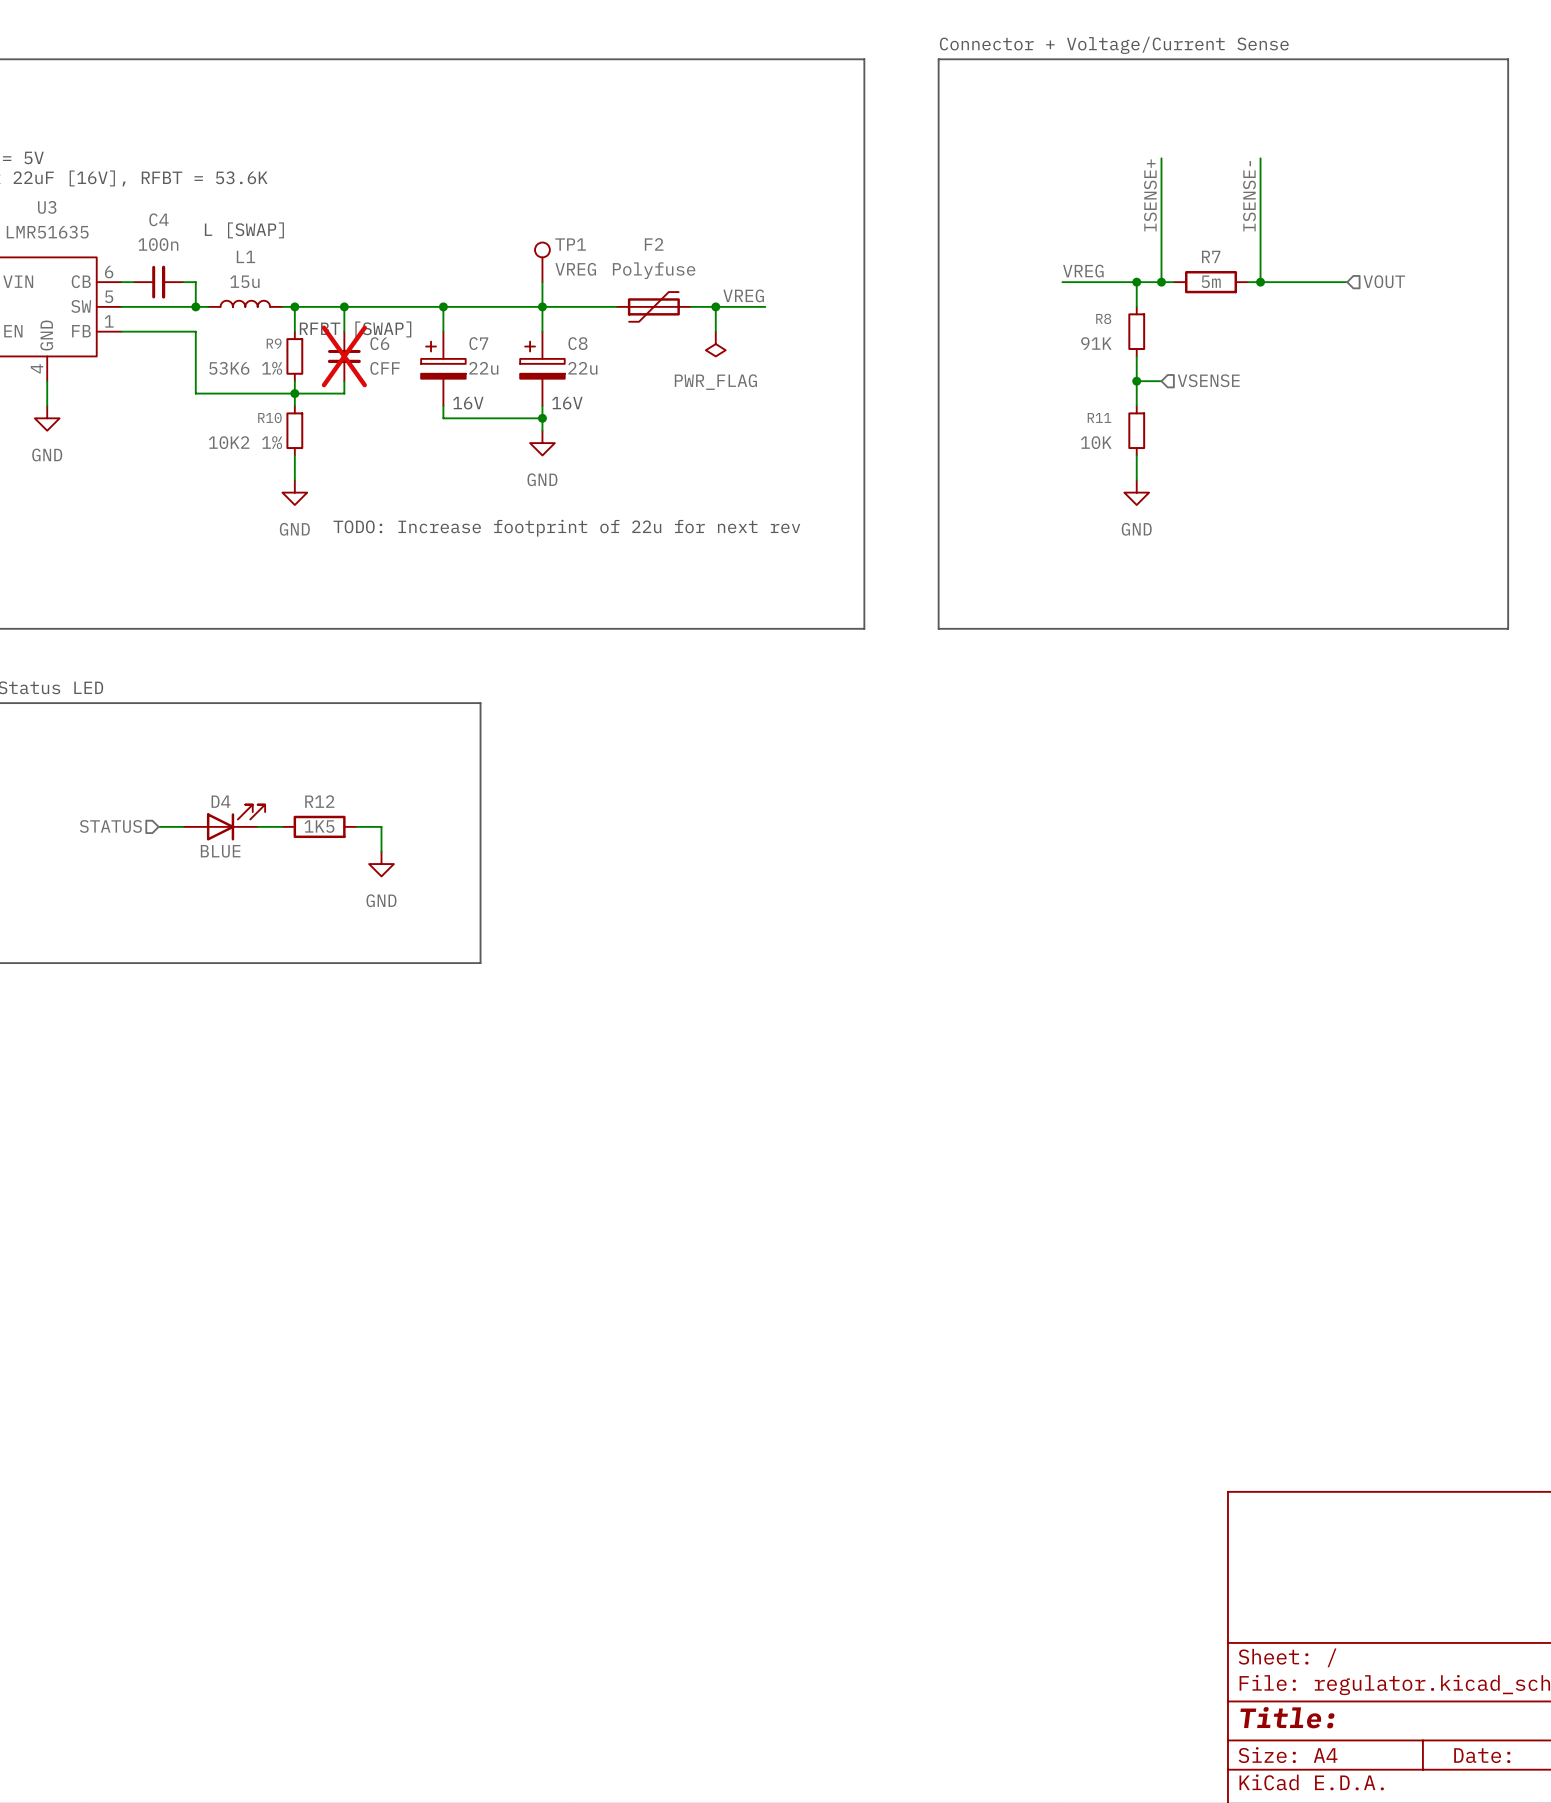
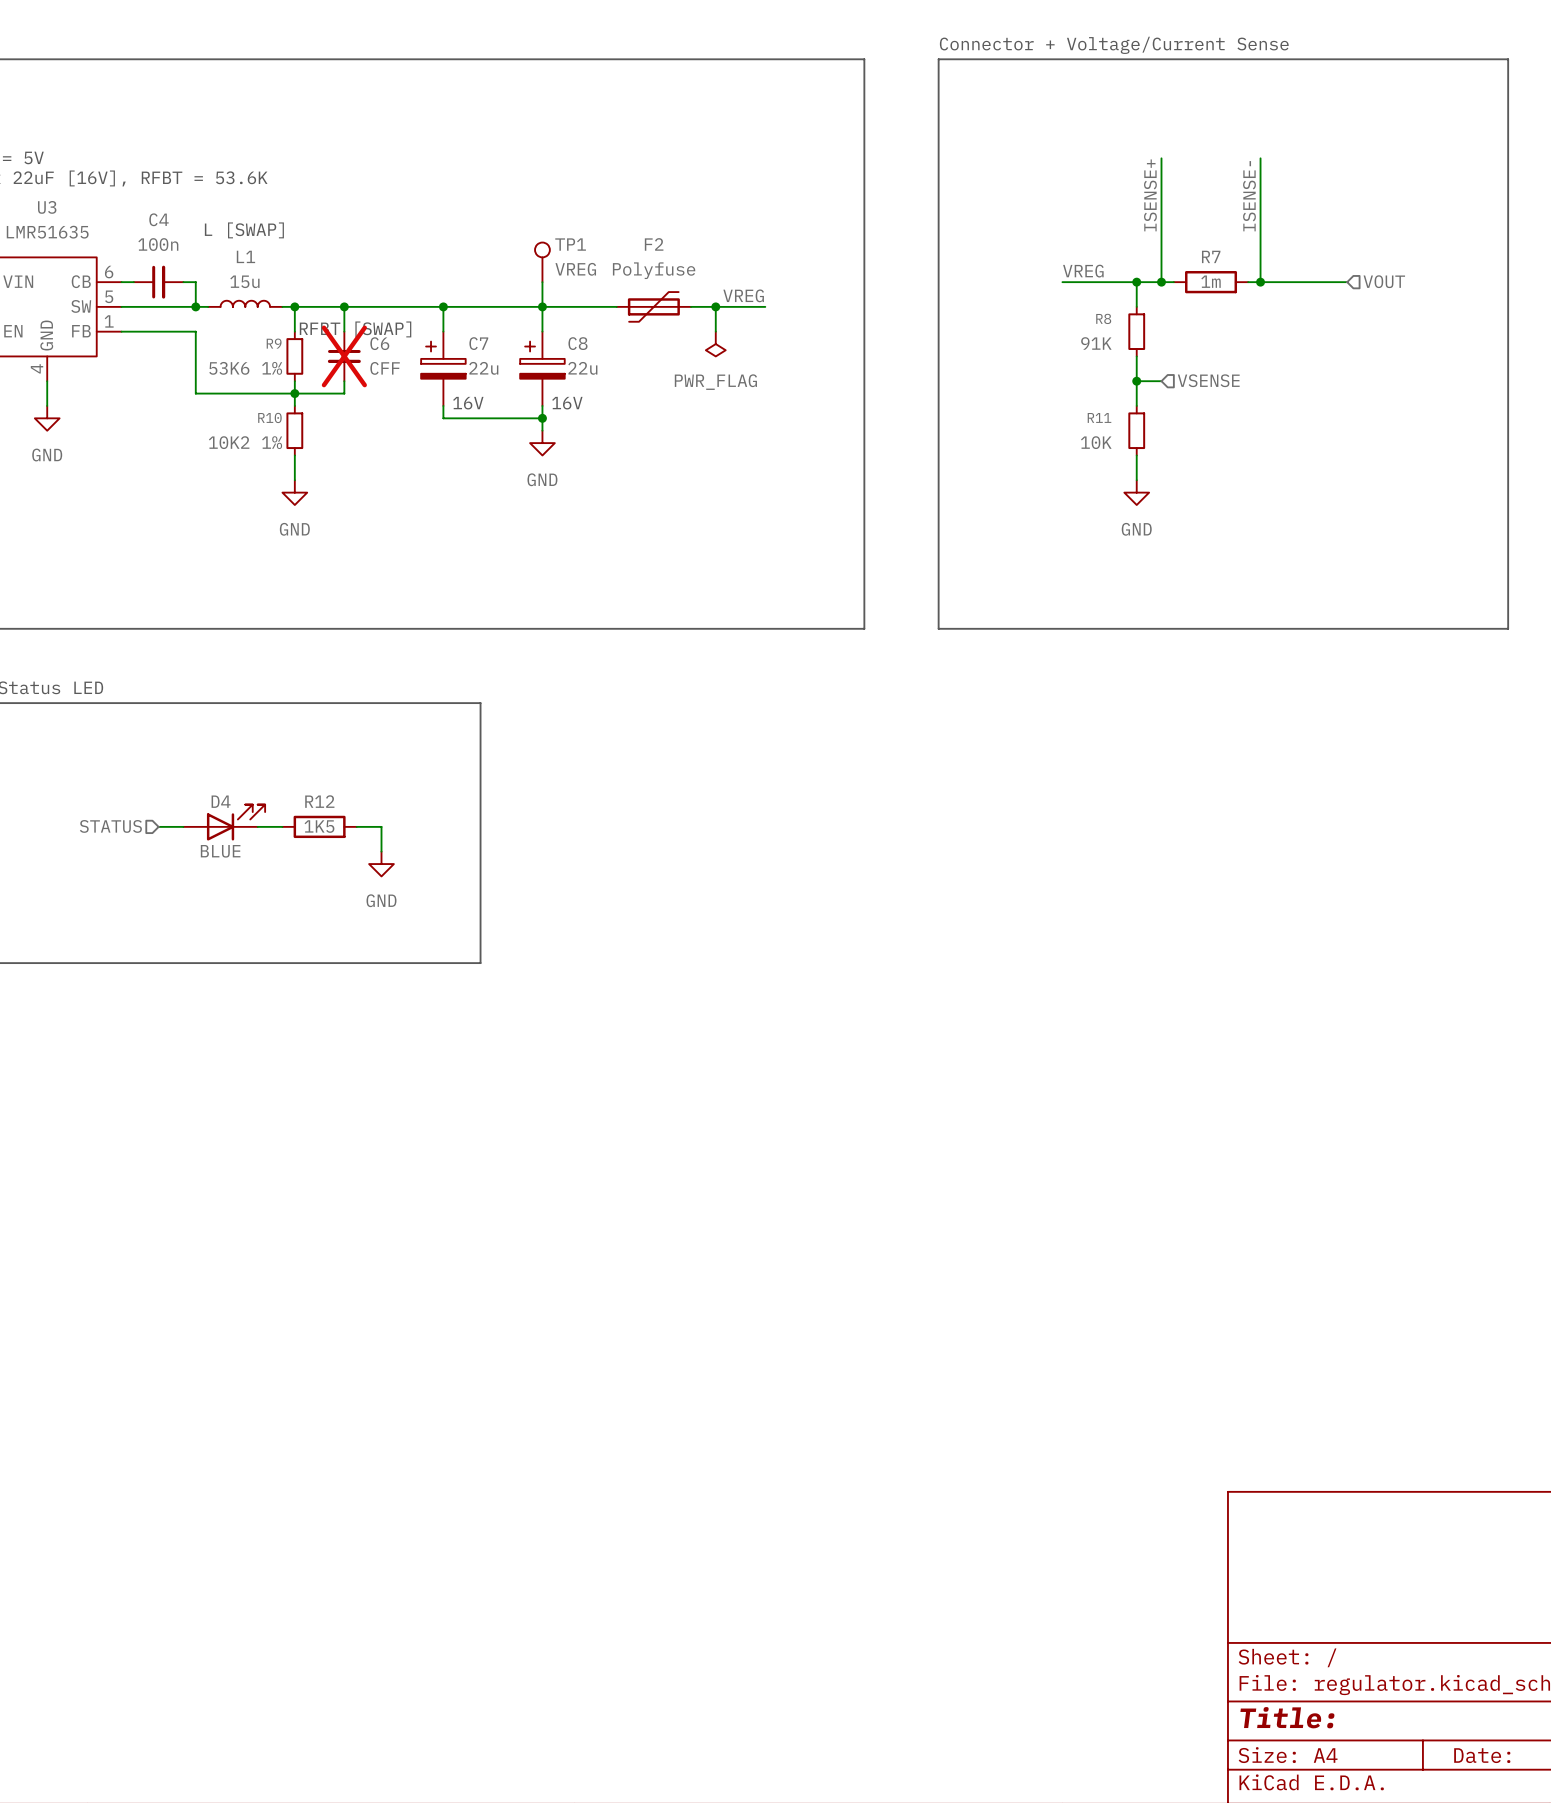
R7 value: 5m (1211, 281) -> 1m (1211, 281)
text: TODO: Increase footprint of 22u for next rev (566, 528) -> none

